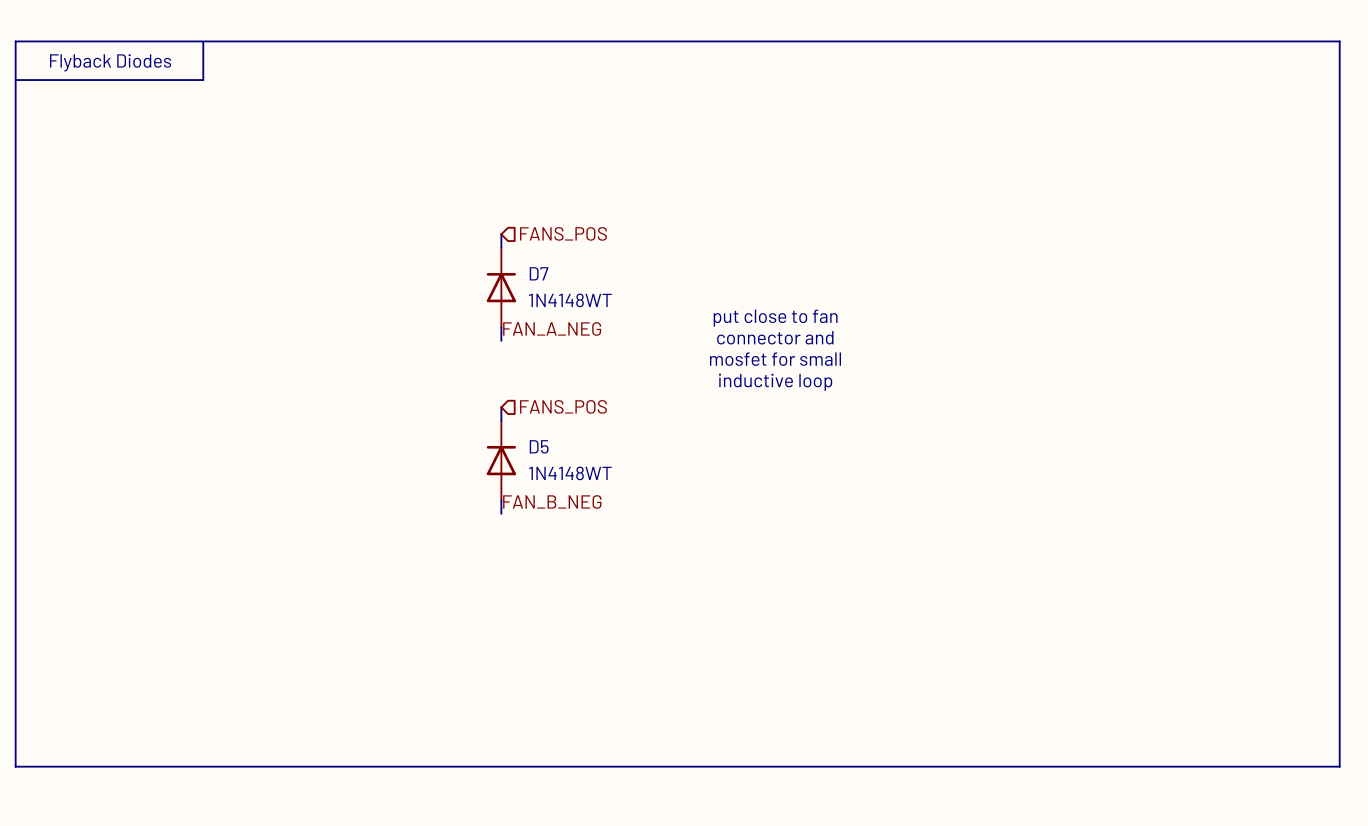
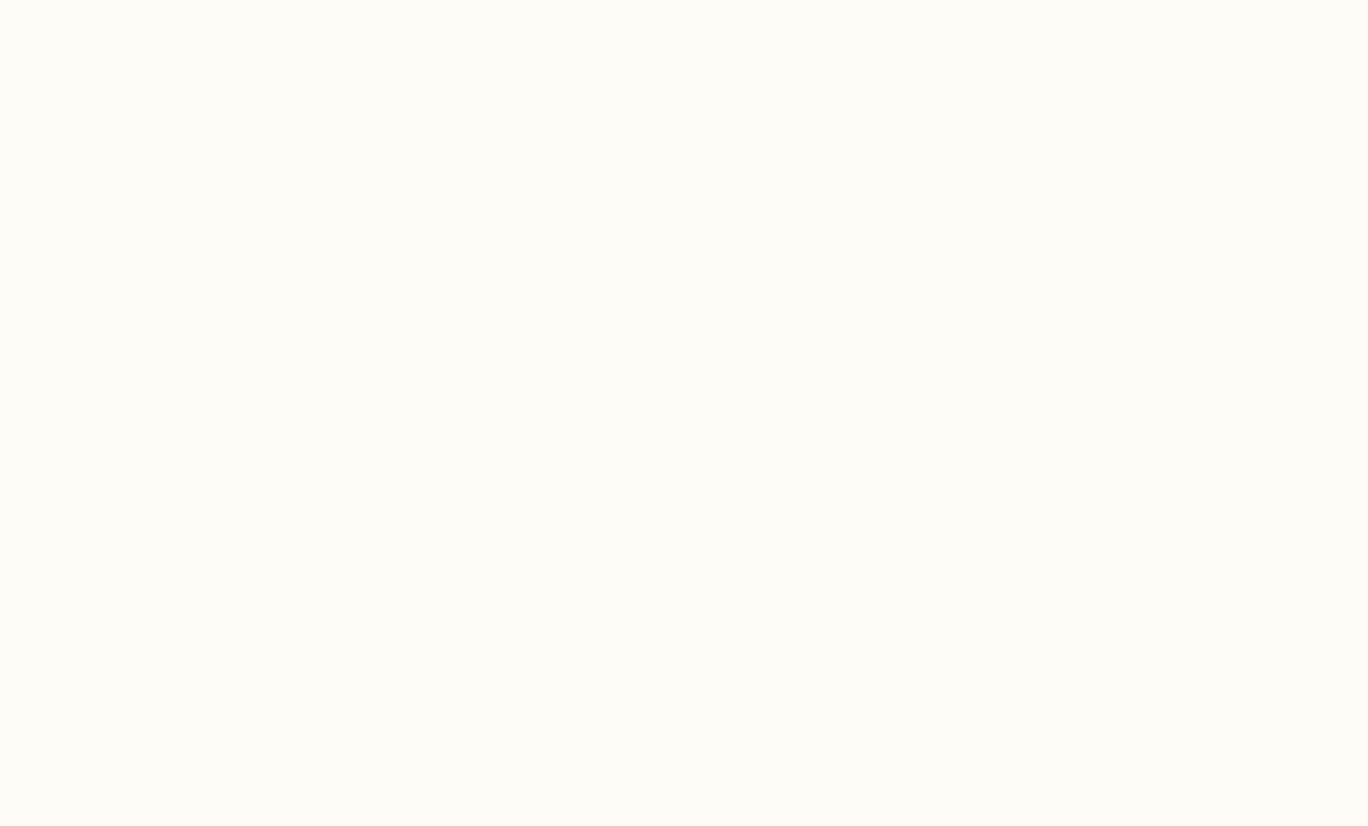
line: (15, 41) (1339, 41) (1339, 766) (15, 766) (15, 41) -> none
line: (203, 42) (203, 80) (16, 80) -> none
text: Flyback Diodes (110, 62) -> none
hierarchical label: FANS_POS (563, 233) -> none
wire: (501, 234) (501, 247) -> none
D7: 1N4148WT (501, 287) -> none
text: put close to fan (775, 318) -> none
wire: (501, 327) (501, 340) -> none
label: FAN_A_NEG (552, 328) -> none
text: connector and (775, 337) -> none
text: mosfet for small (775, 359) -> none
text: inductive loop (775, 382) -> none
hierarchical label: FANS_POS (563, 406) -> none
wire: (501, 407) (501, 420) -> none
D5: 1N4148WT (501, 460) -> none
wire: (501, 500) (501, 513) -> none
label: FAN_B_NEG (552, 501) -> none

